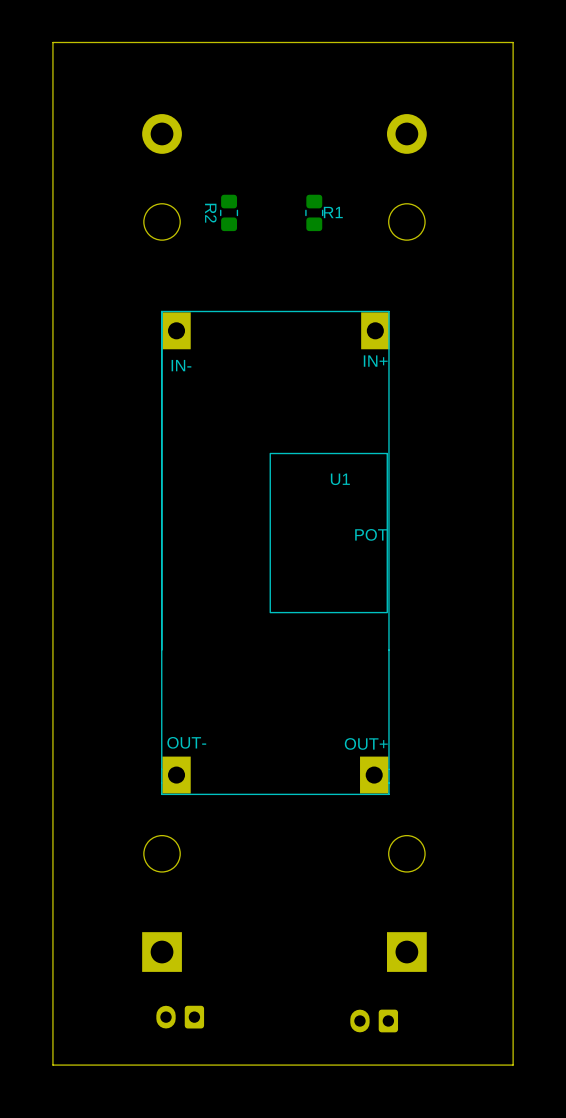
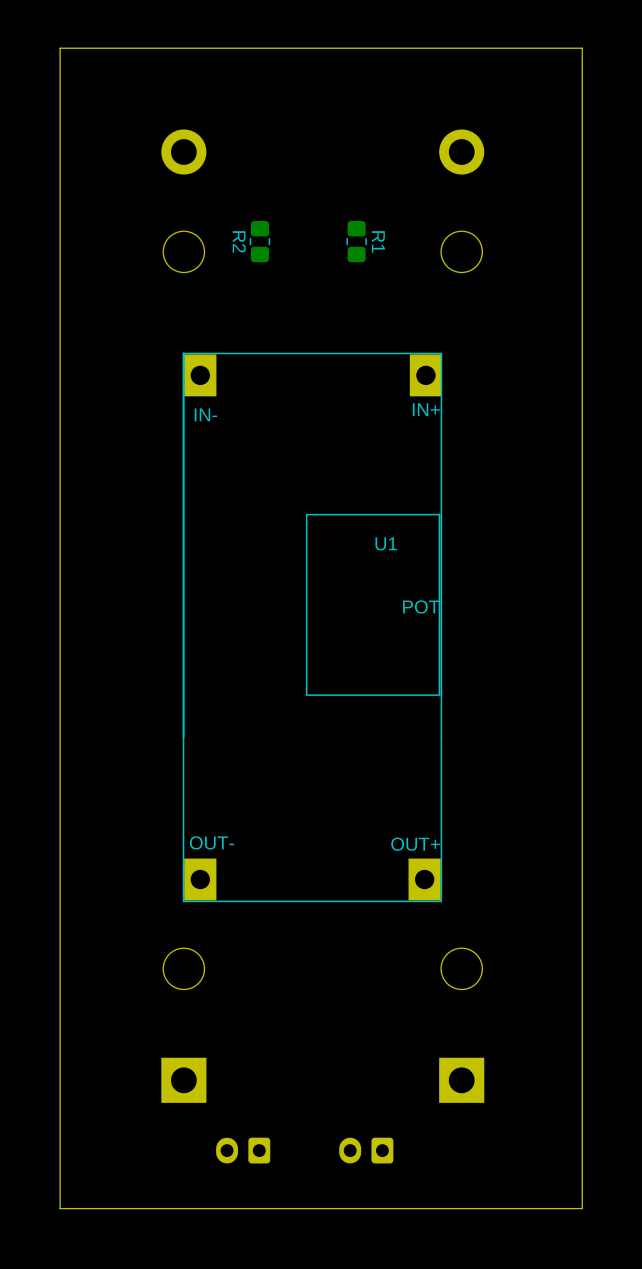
R1 name rotation: 0° (333, 212) -> 90° clockwise (378, 241)
part position: (180, 1017) -> (243, 1150)
part position: (374, 1020) -> (366, 1150)

